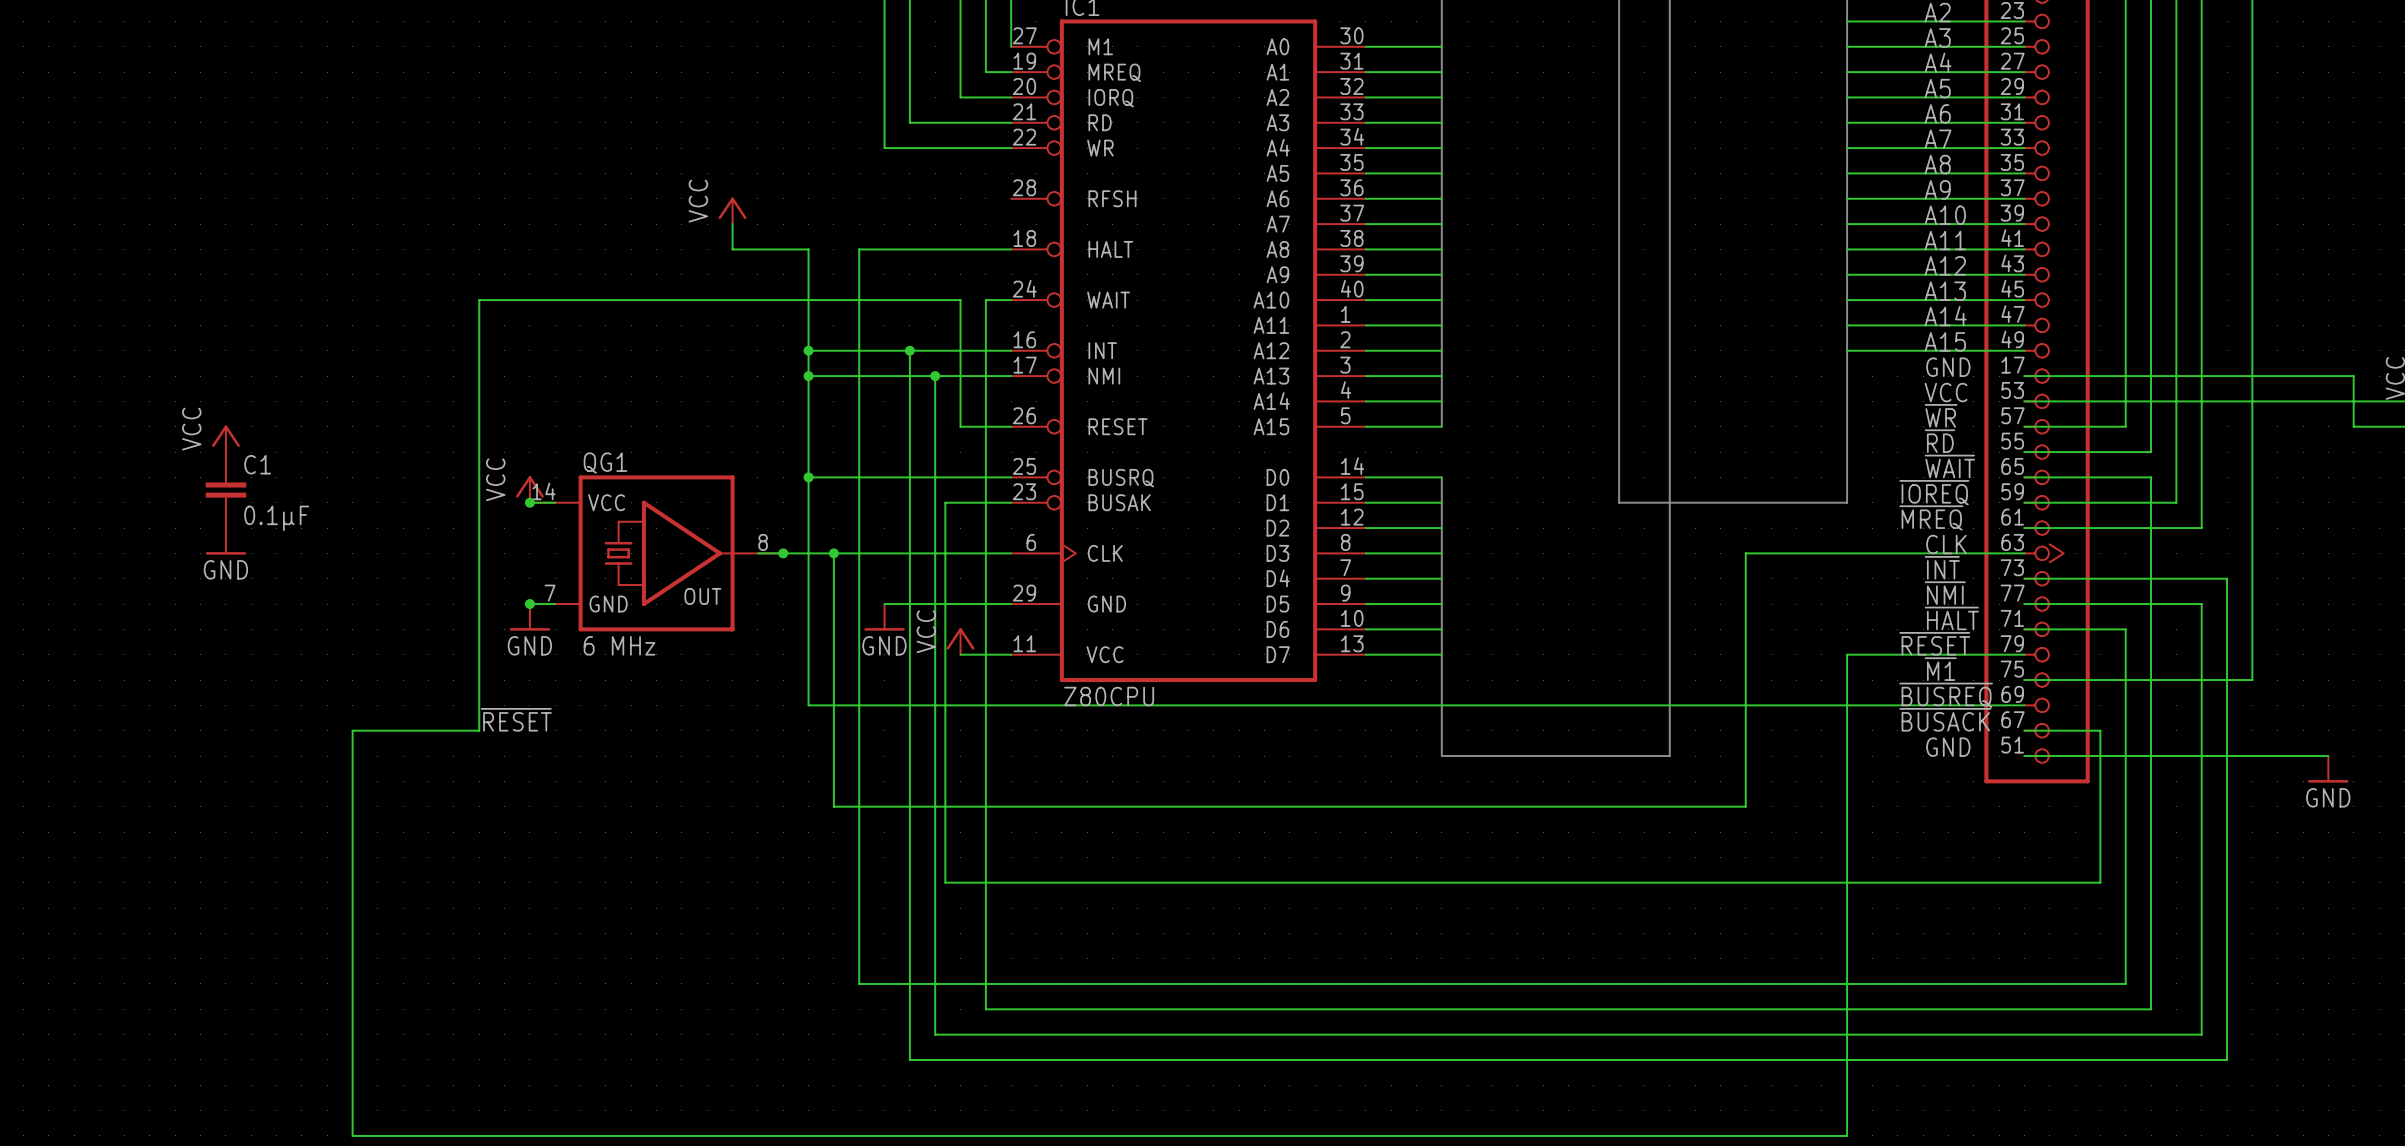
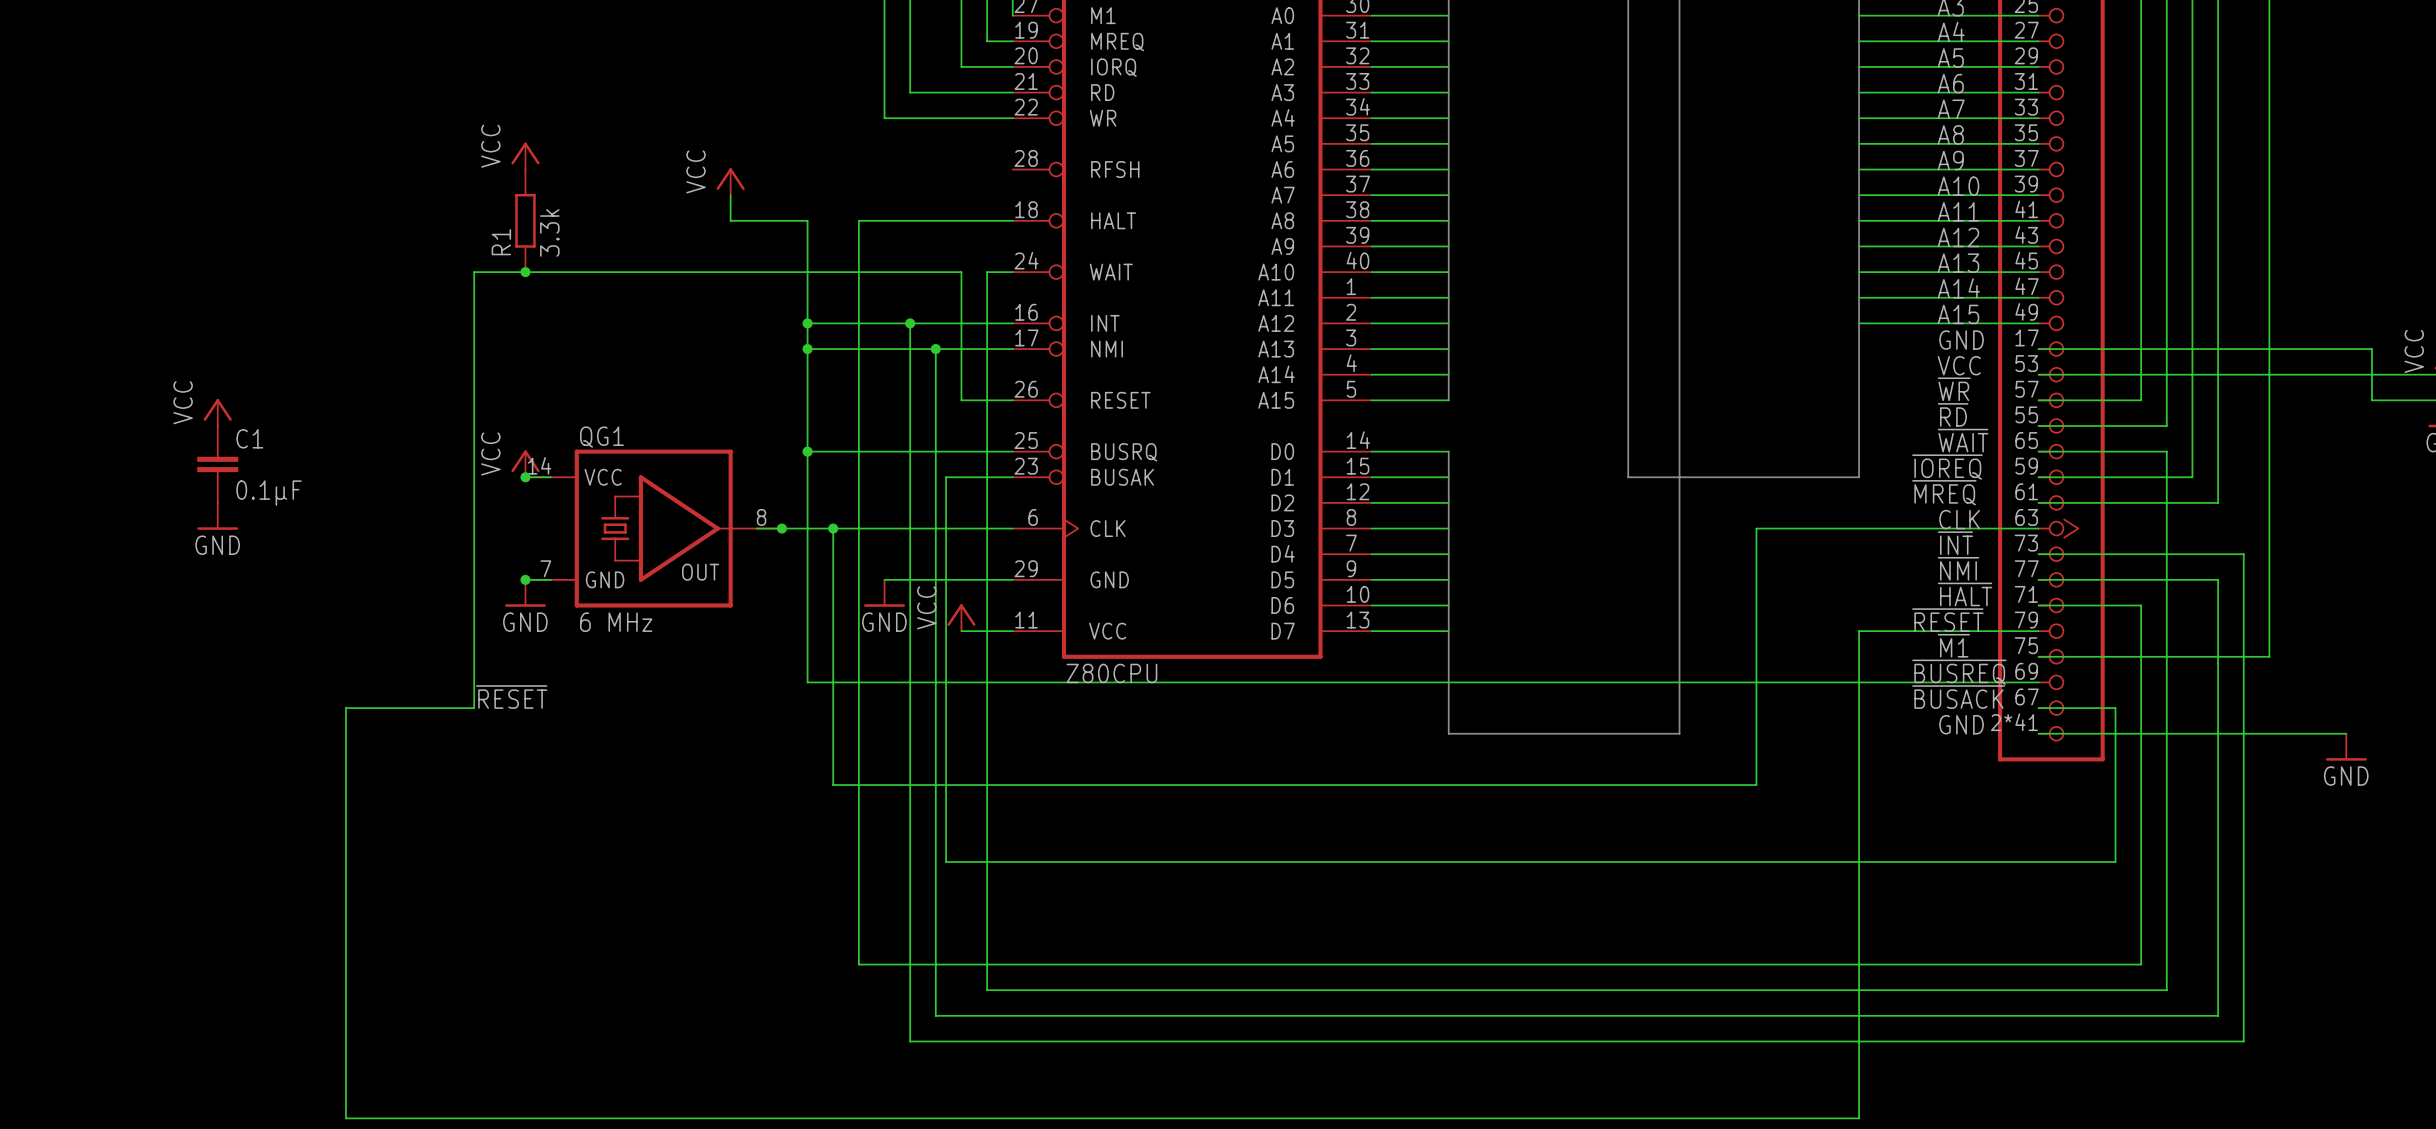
power symbol: none -> VCC (525, 156)
R1: none -> 3.3k (525, 220)
junction: none -> (525, 272)
part pin number: 51 (2012, 745) -> 2*41 (2014, 722)

